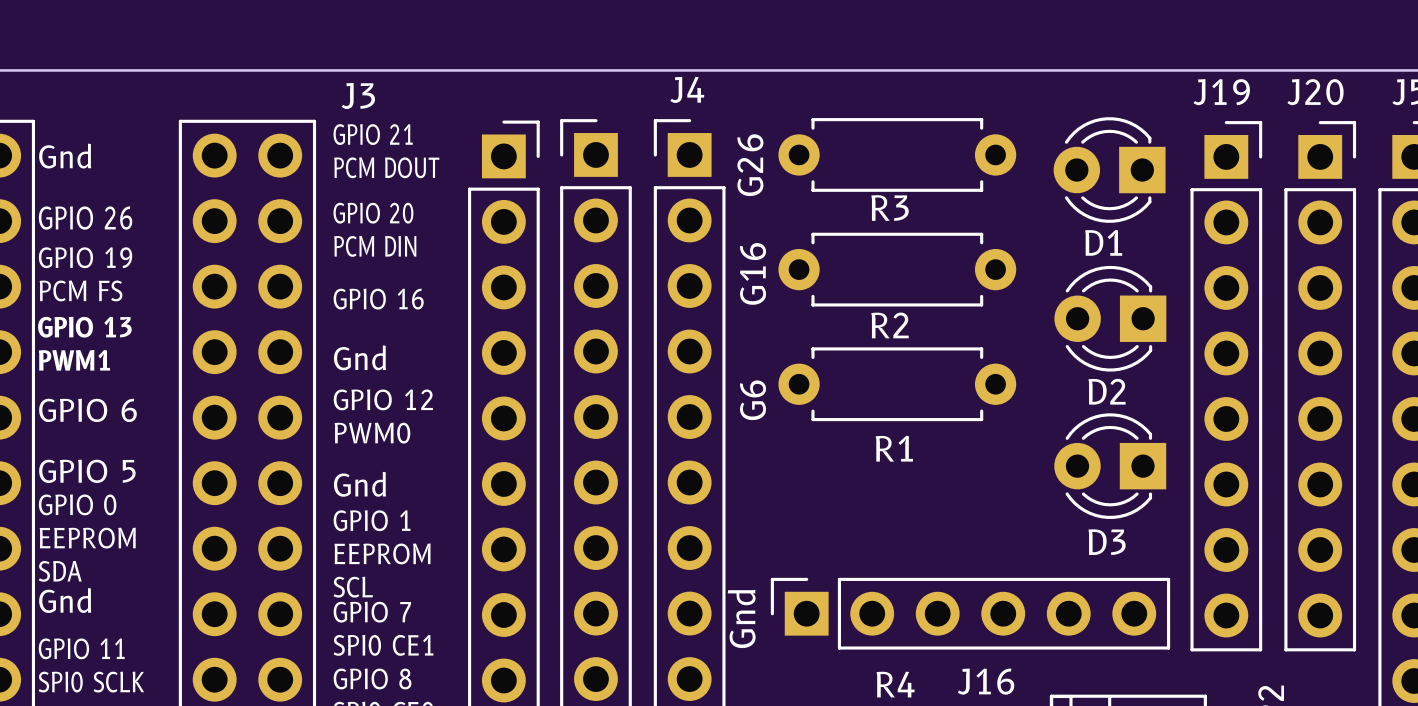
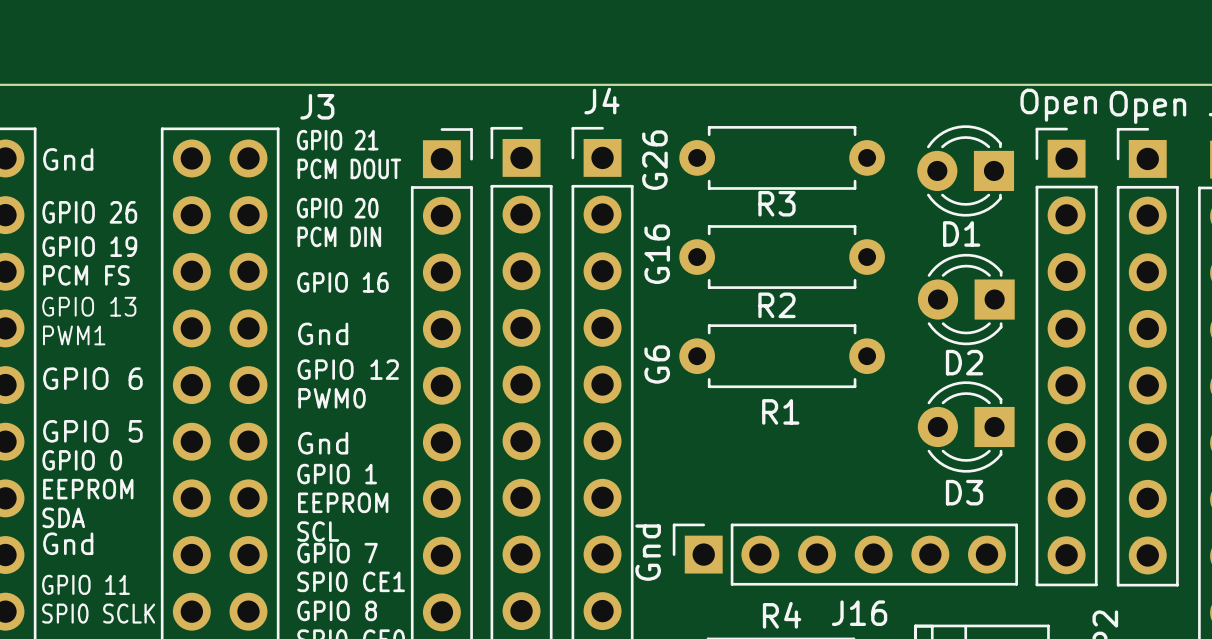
Open: none -> (1066, 356)
Open: none -> (1147, 357)
J19: (1226, 386) -> none
J20: (1320, 386) -> none

